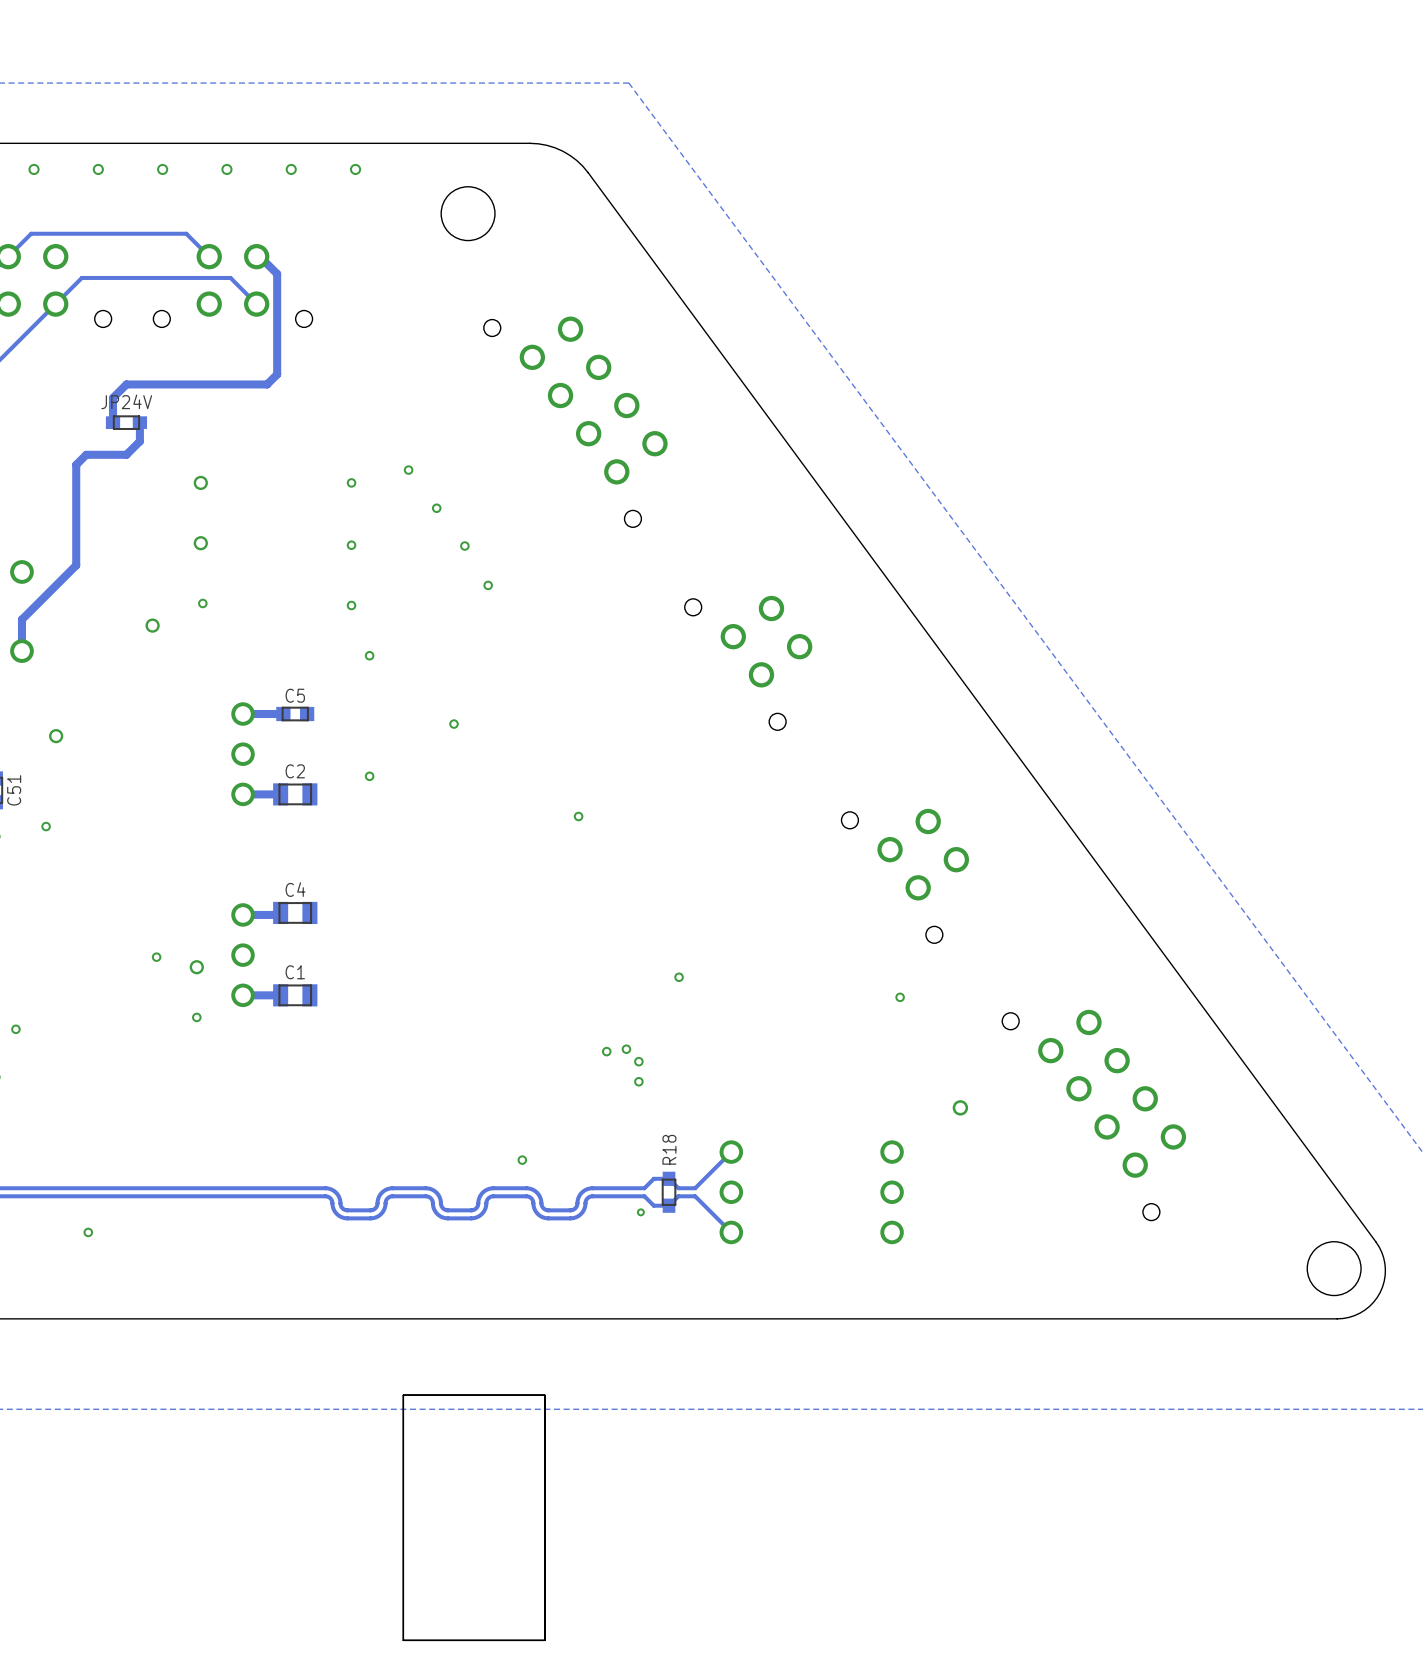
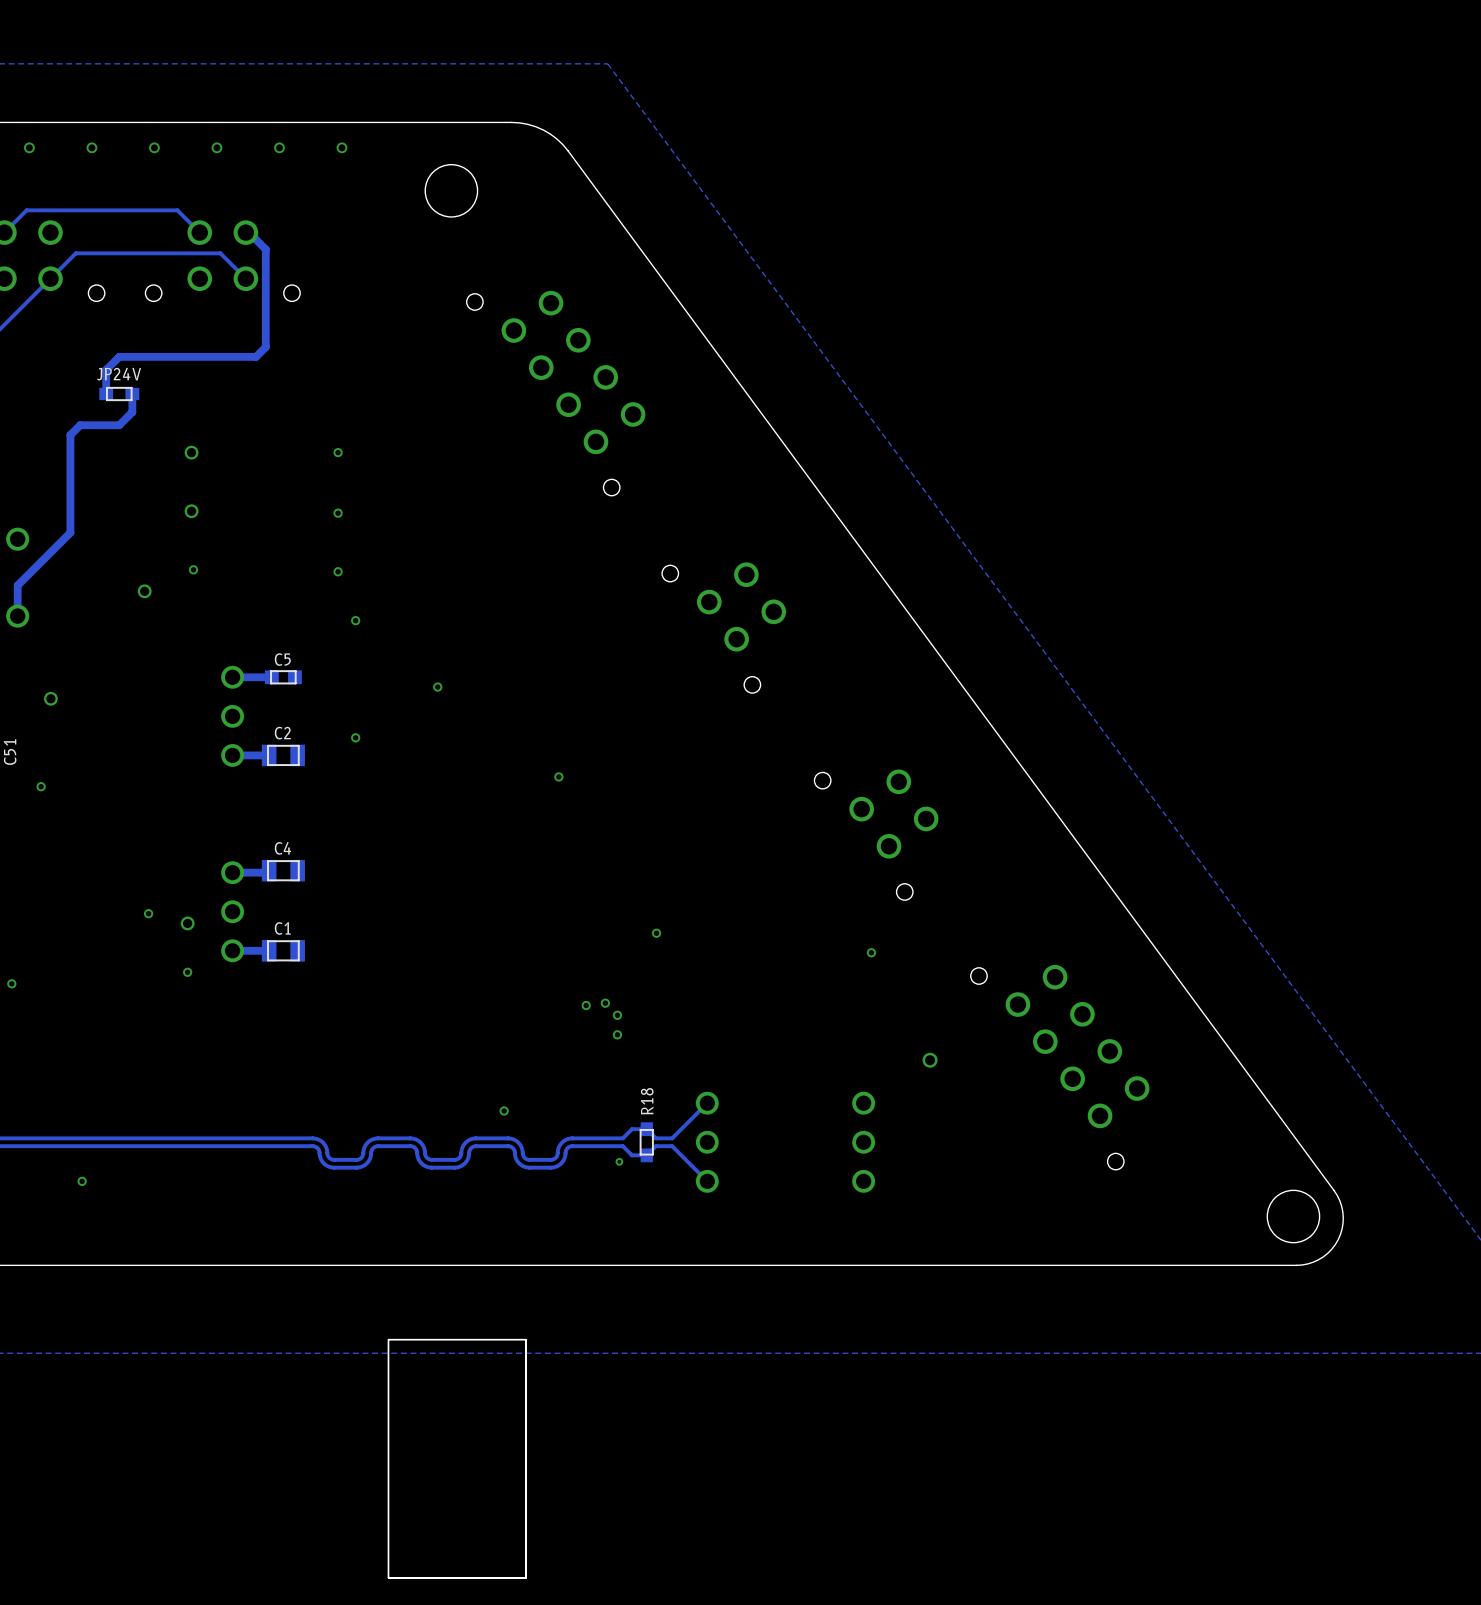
via: (408, 470) -> none
via: (436, 508) -> none
via: (464, 546) -> none
via: (488, 585) -> none

